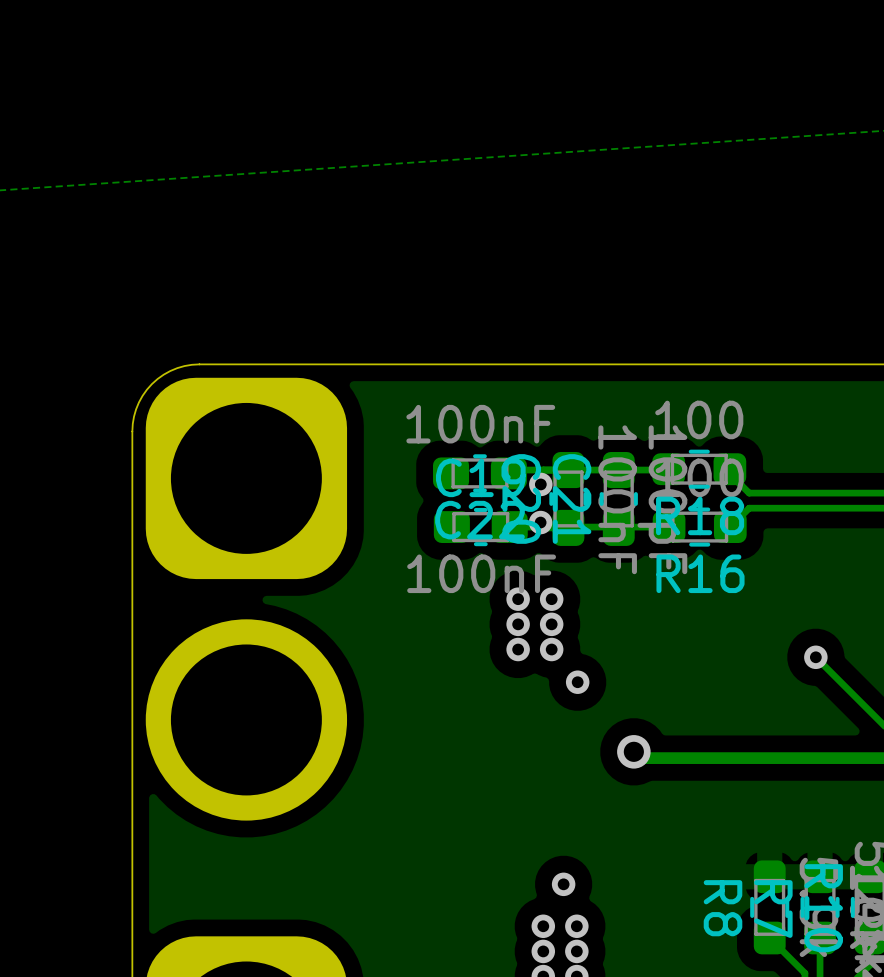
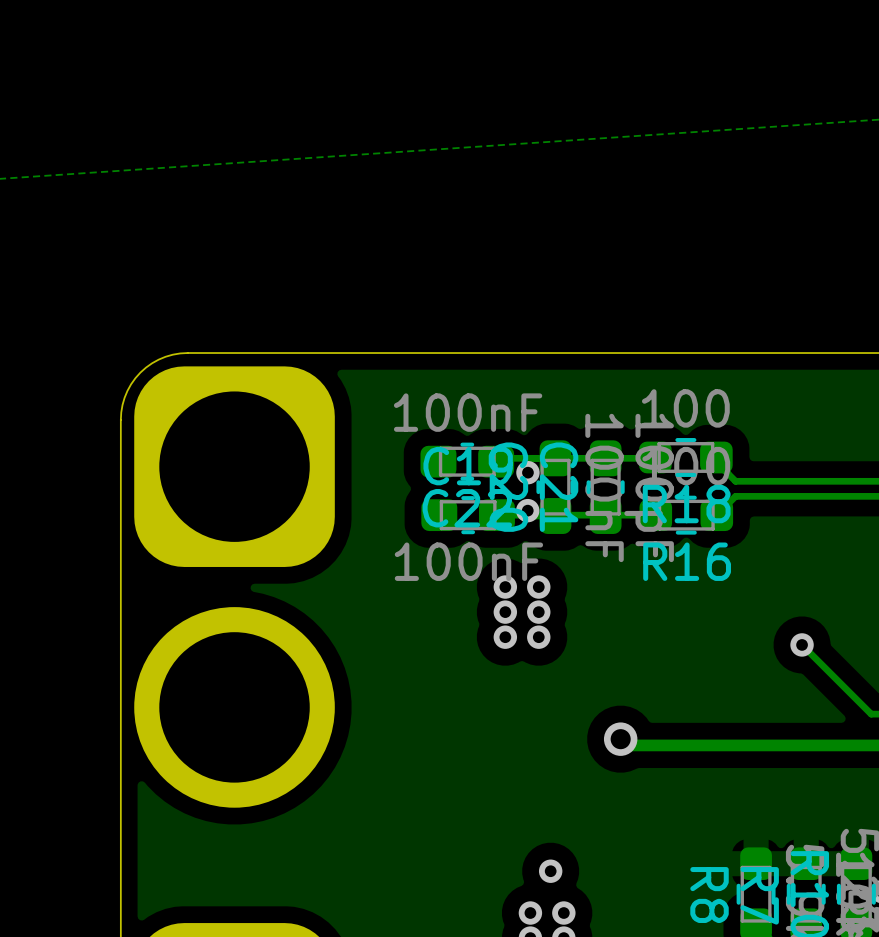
via: (577, 682) -> none

